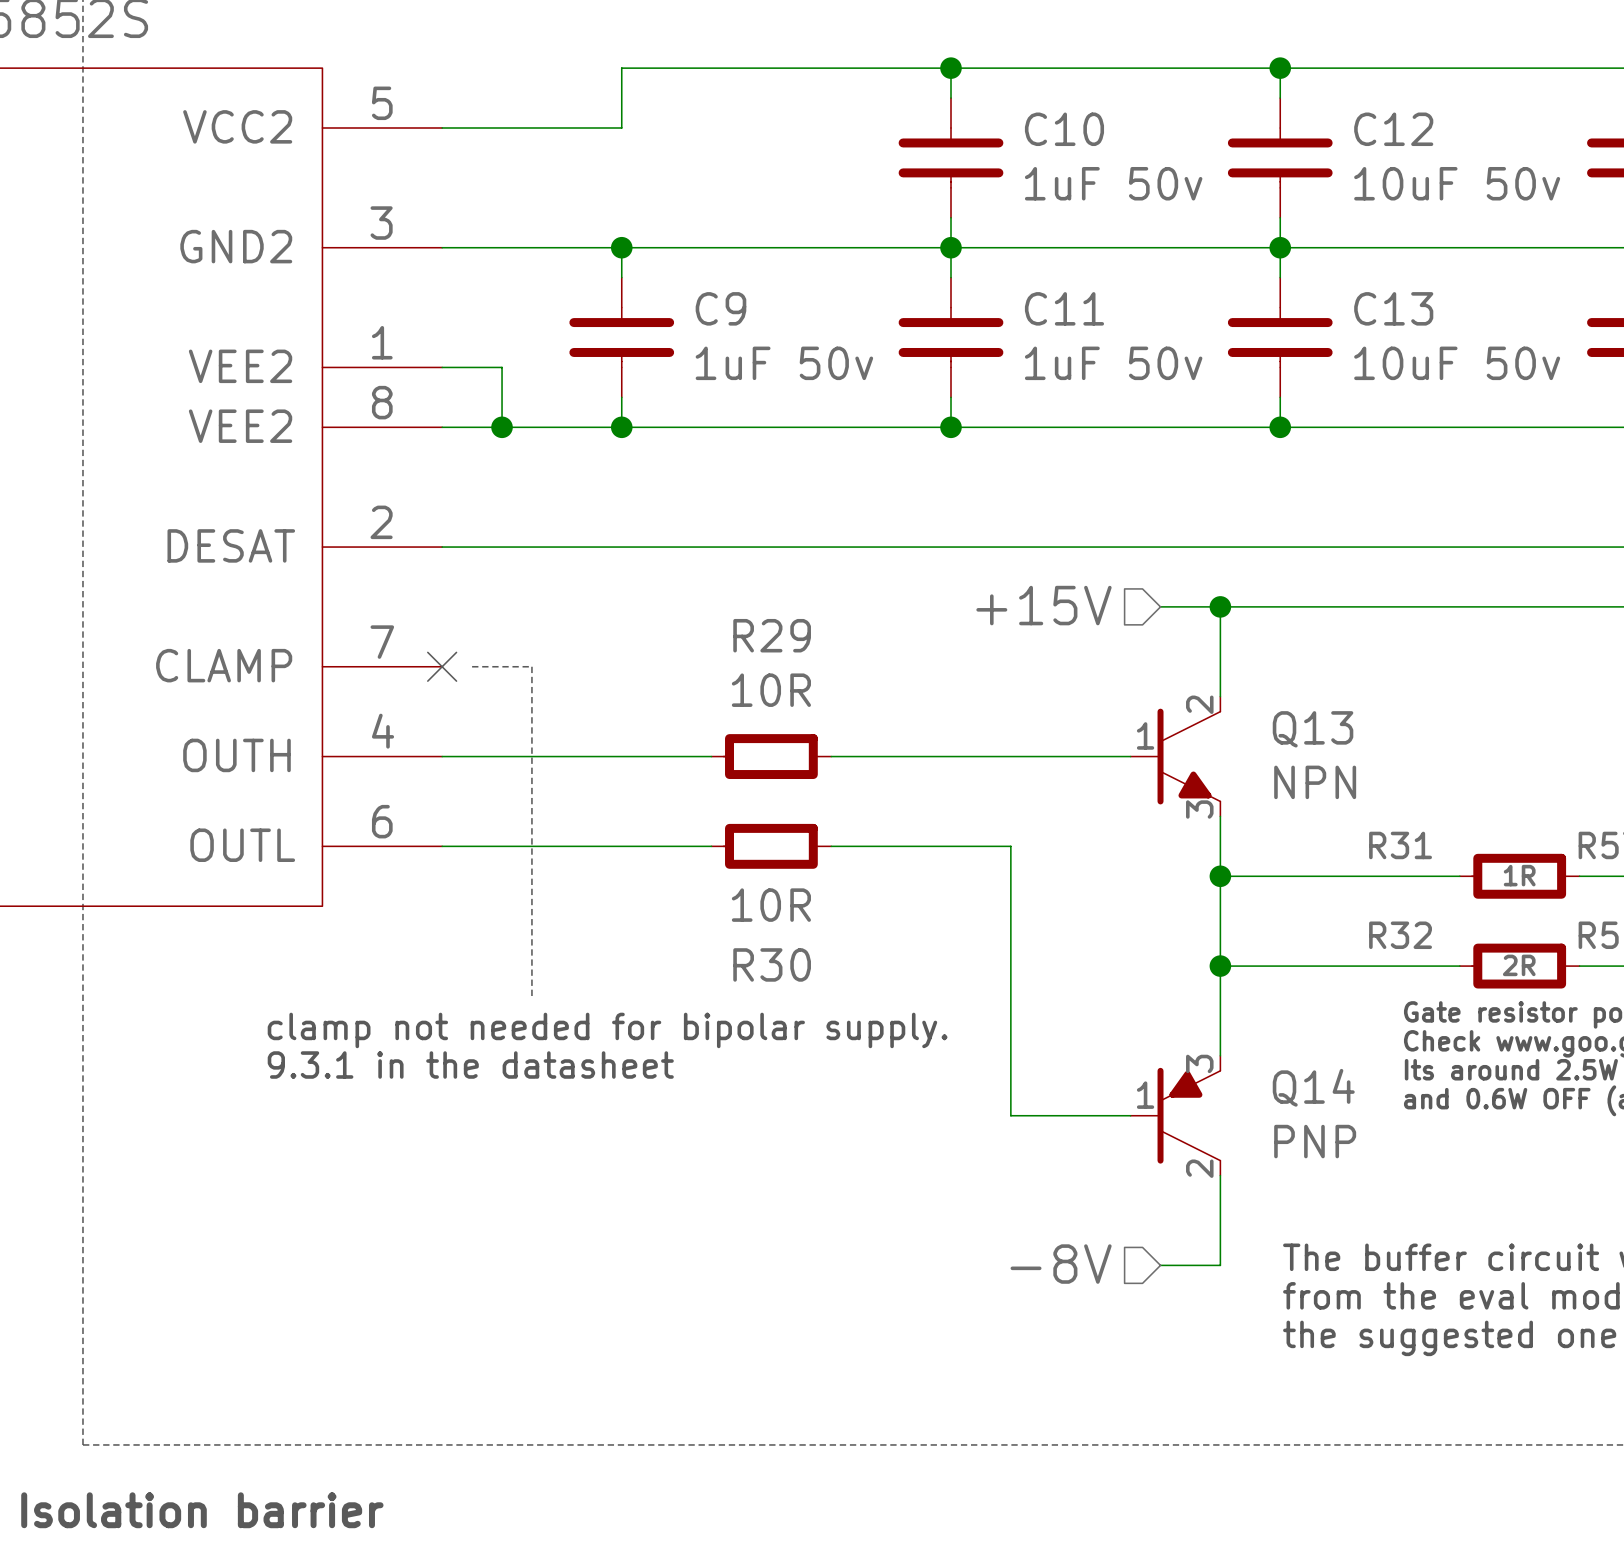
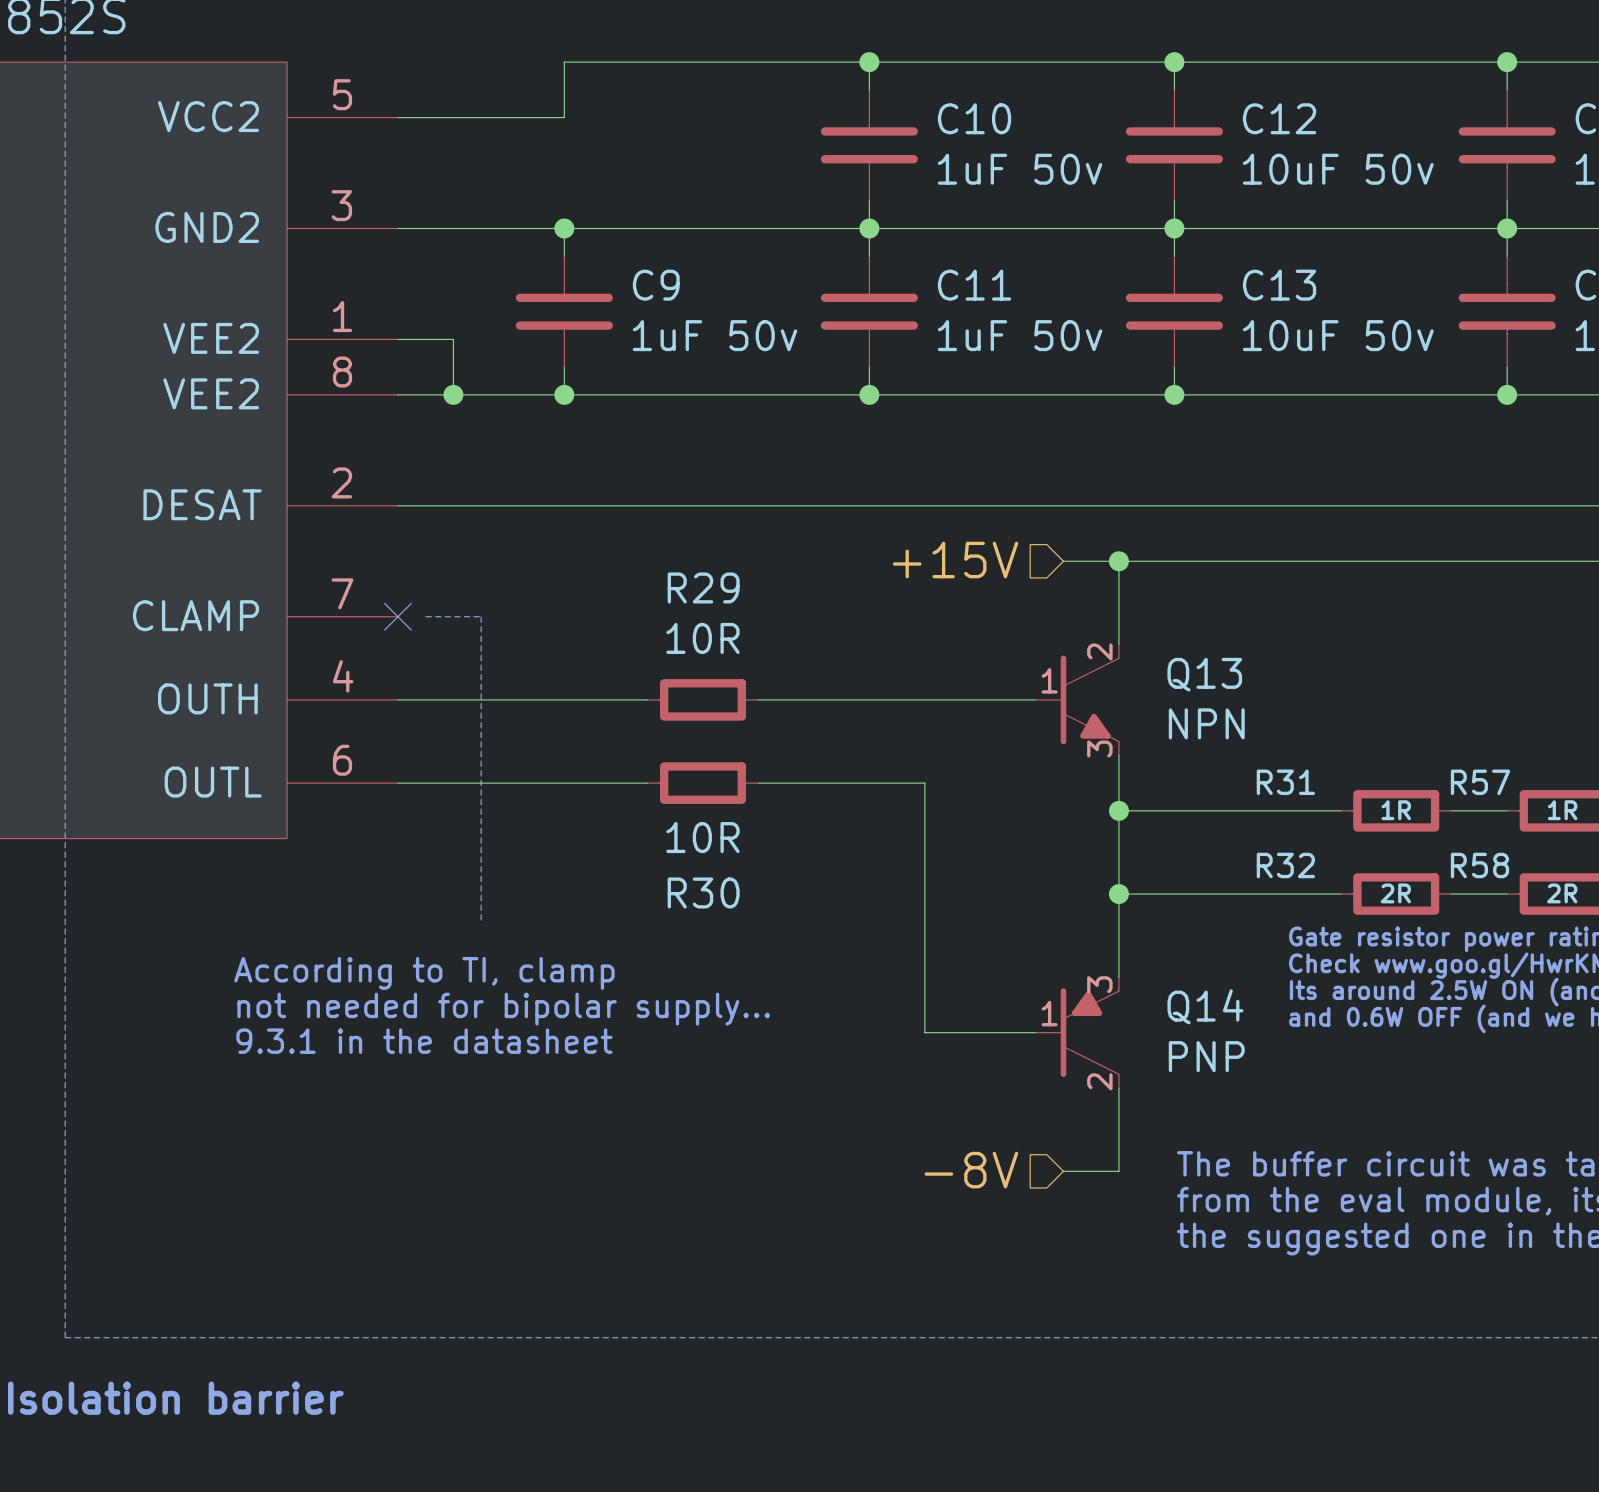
text: clamp not needed for bipolar supply. (607, 1030) -> none
text: none -> According to TI, clamp (424, 973)
text position: 9.3.1 in the datasheet (470, 1065) -> 9.3.1 in the datasheet (424, 1041)
text: none -> not needed for bipolar supply... (503, 1009)

